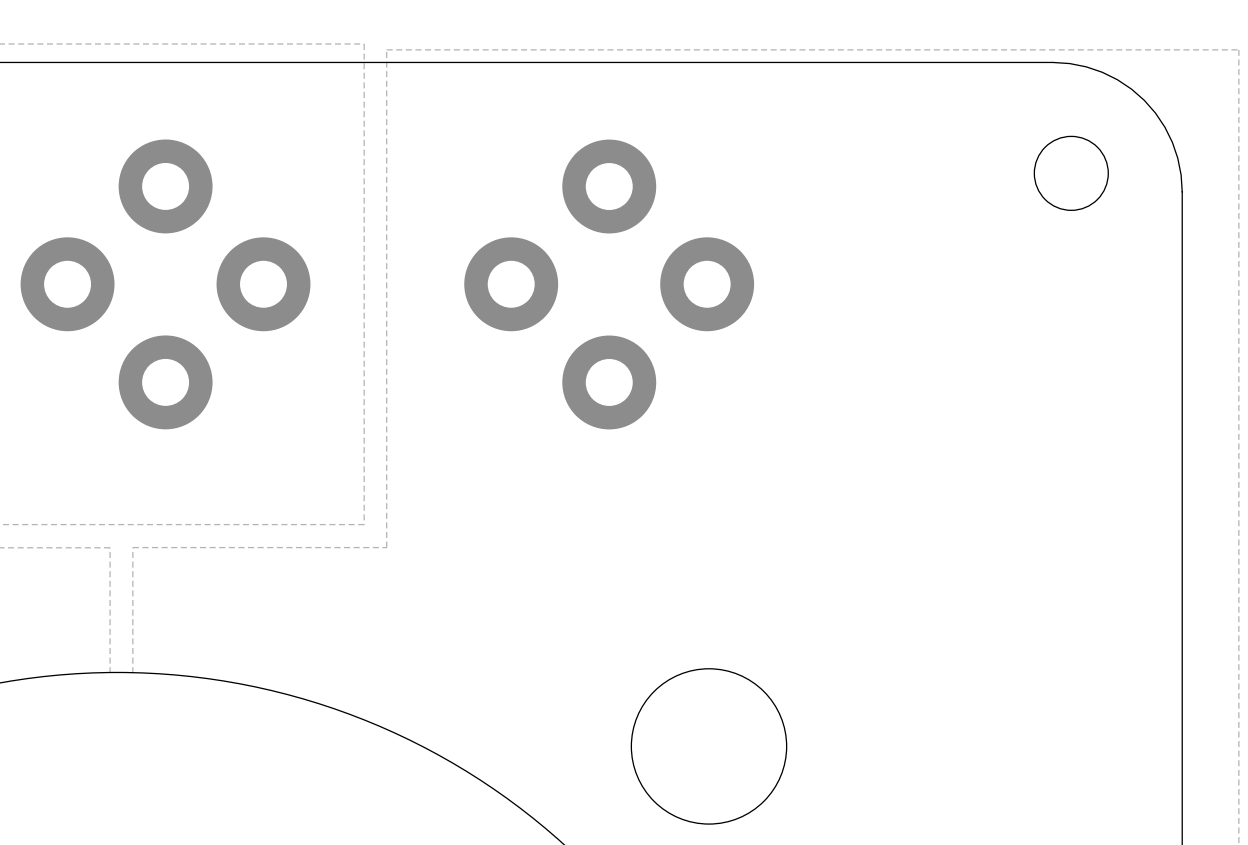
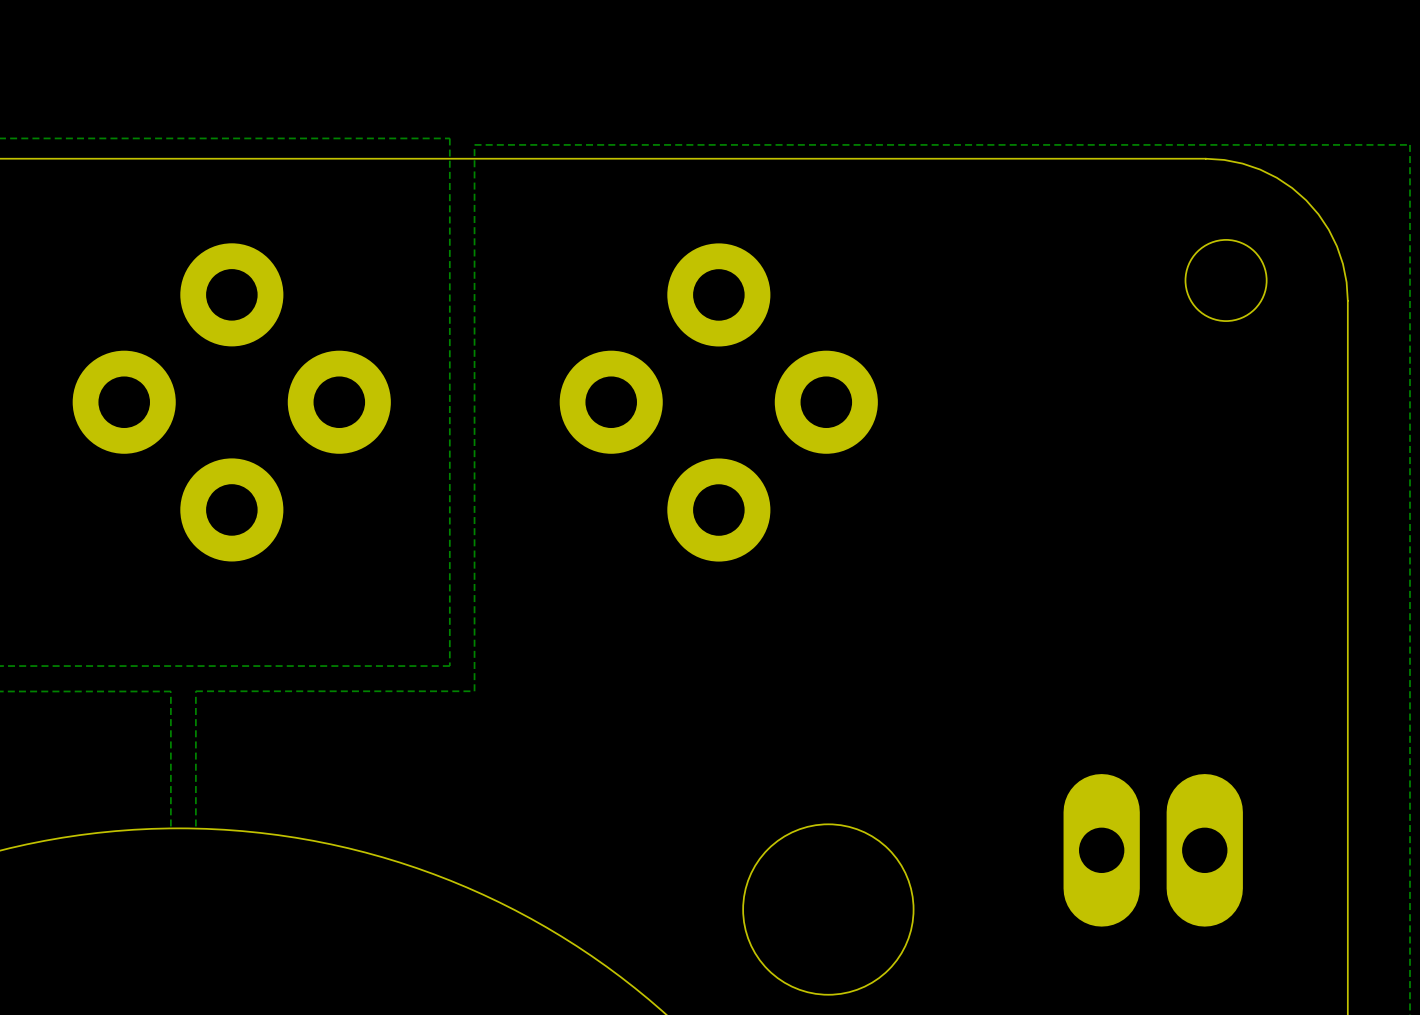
part: none -> (1153, 850)

